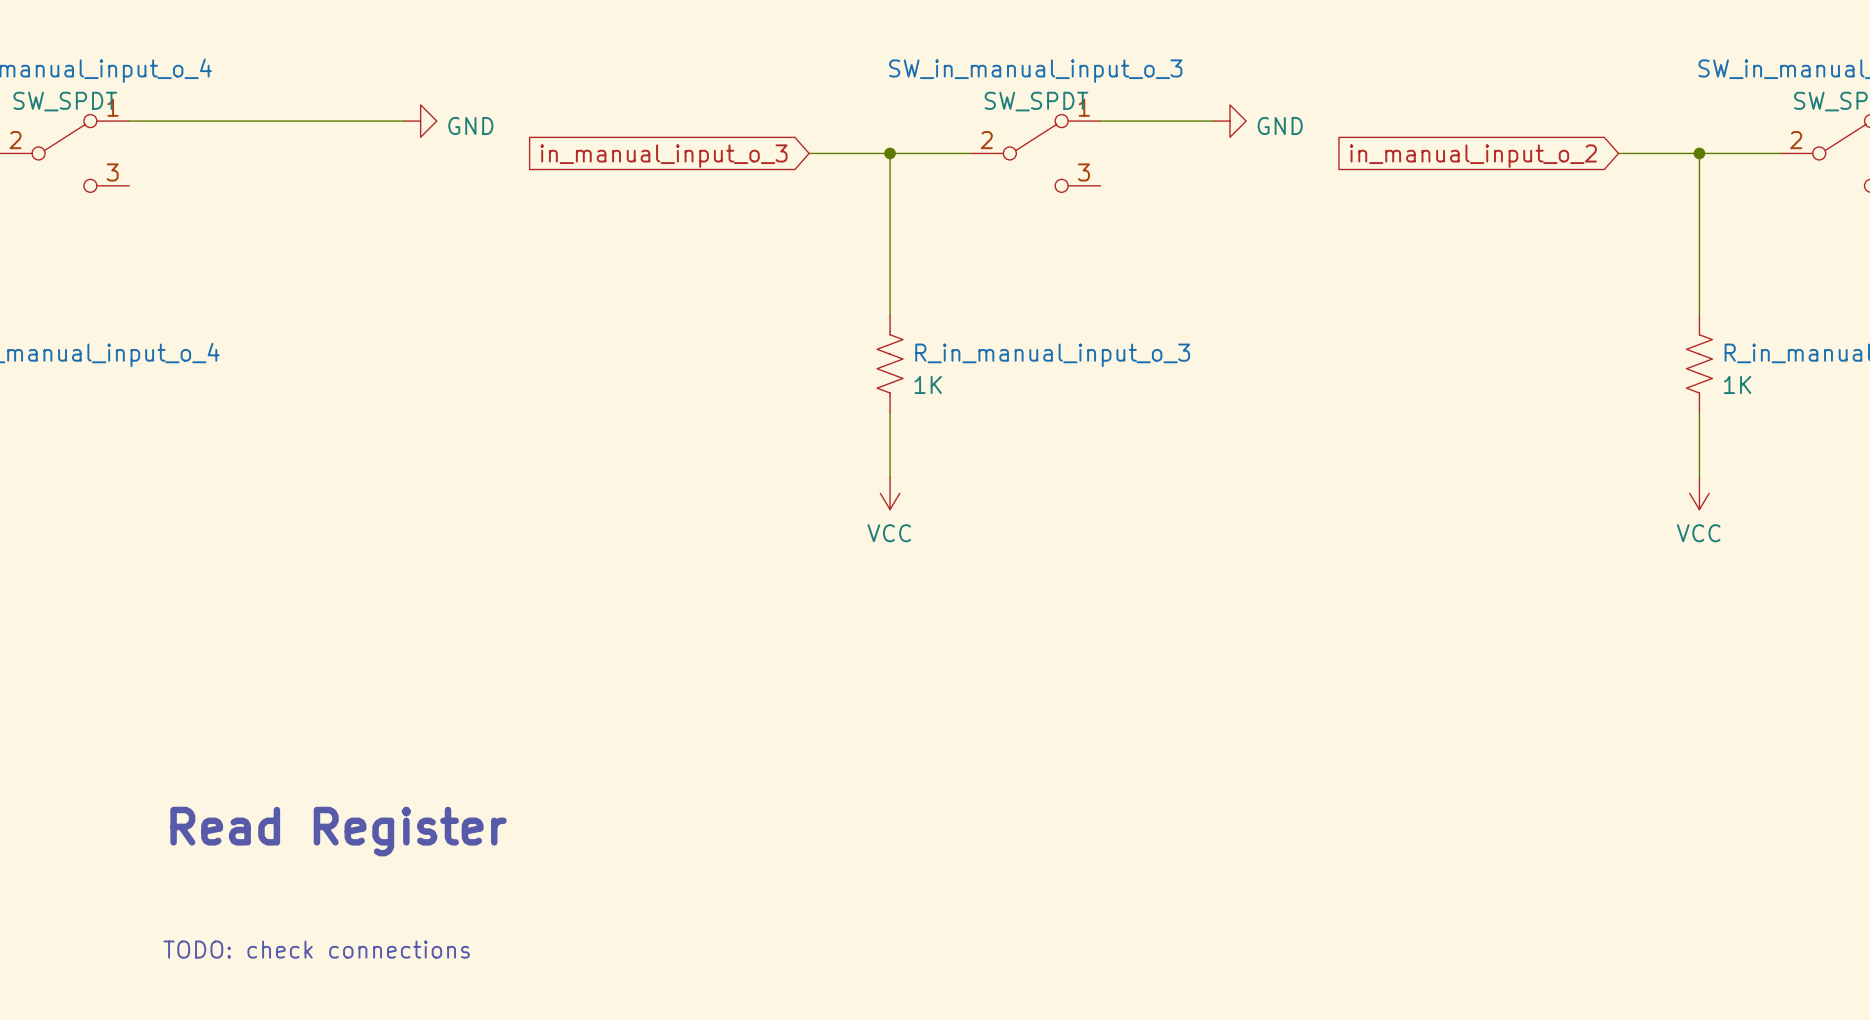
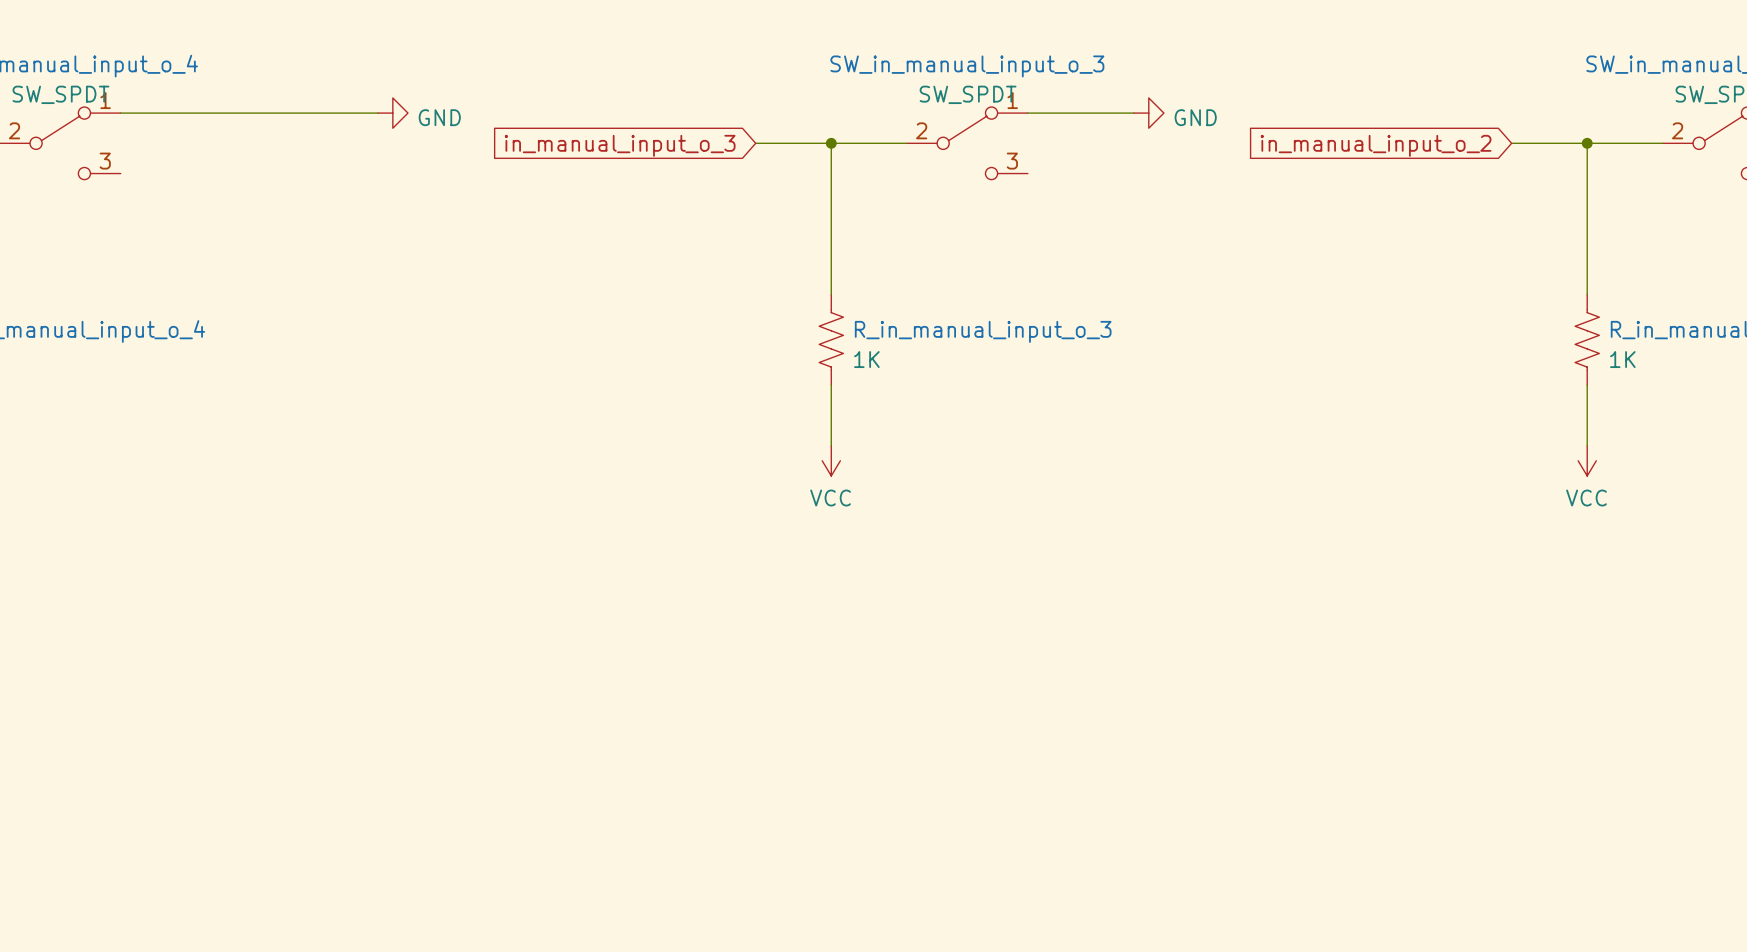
text: Read Register (338, 831) -> none
text: TODO: check connections (316, 949) -> none

